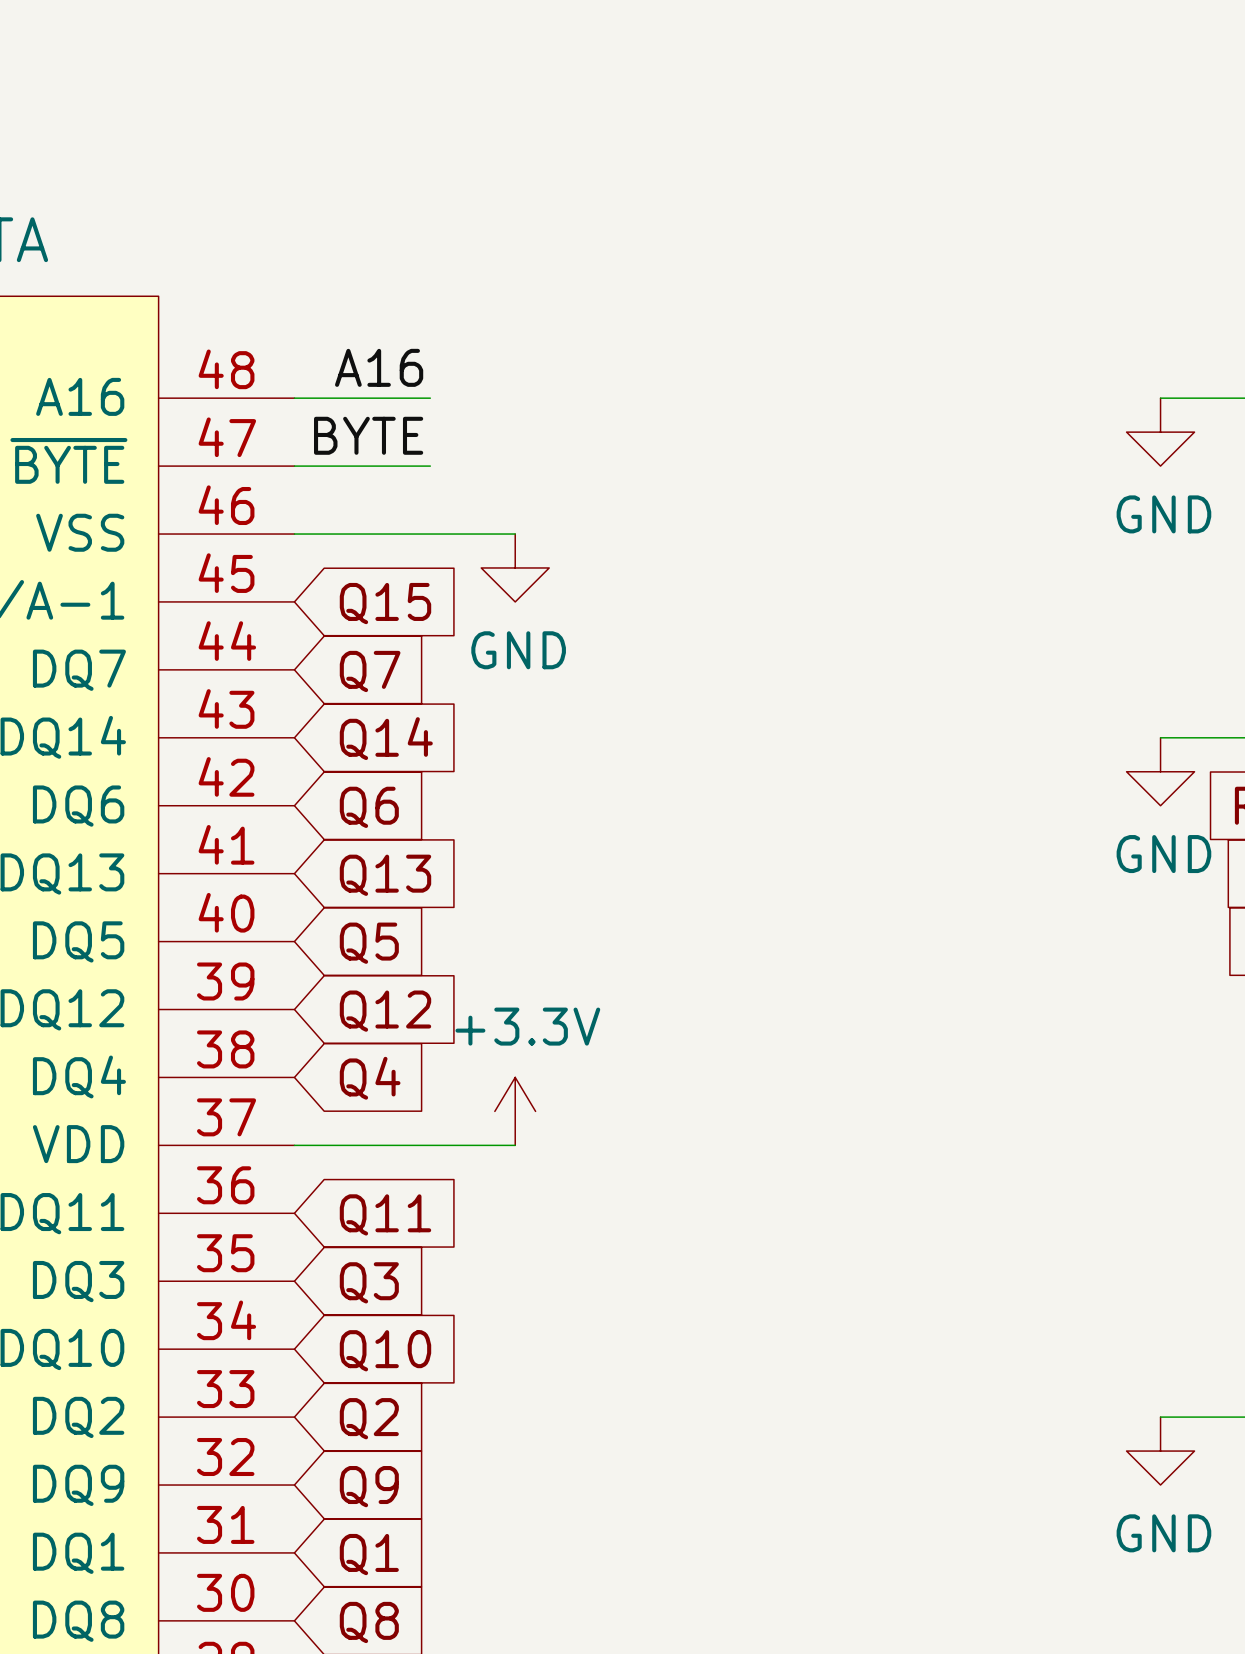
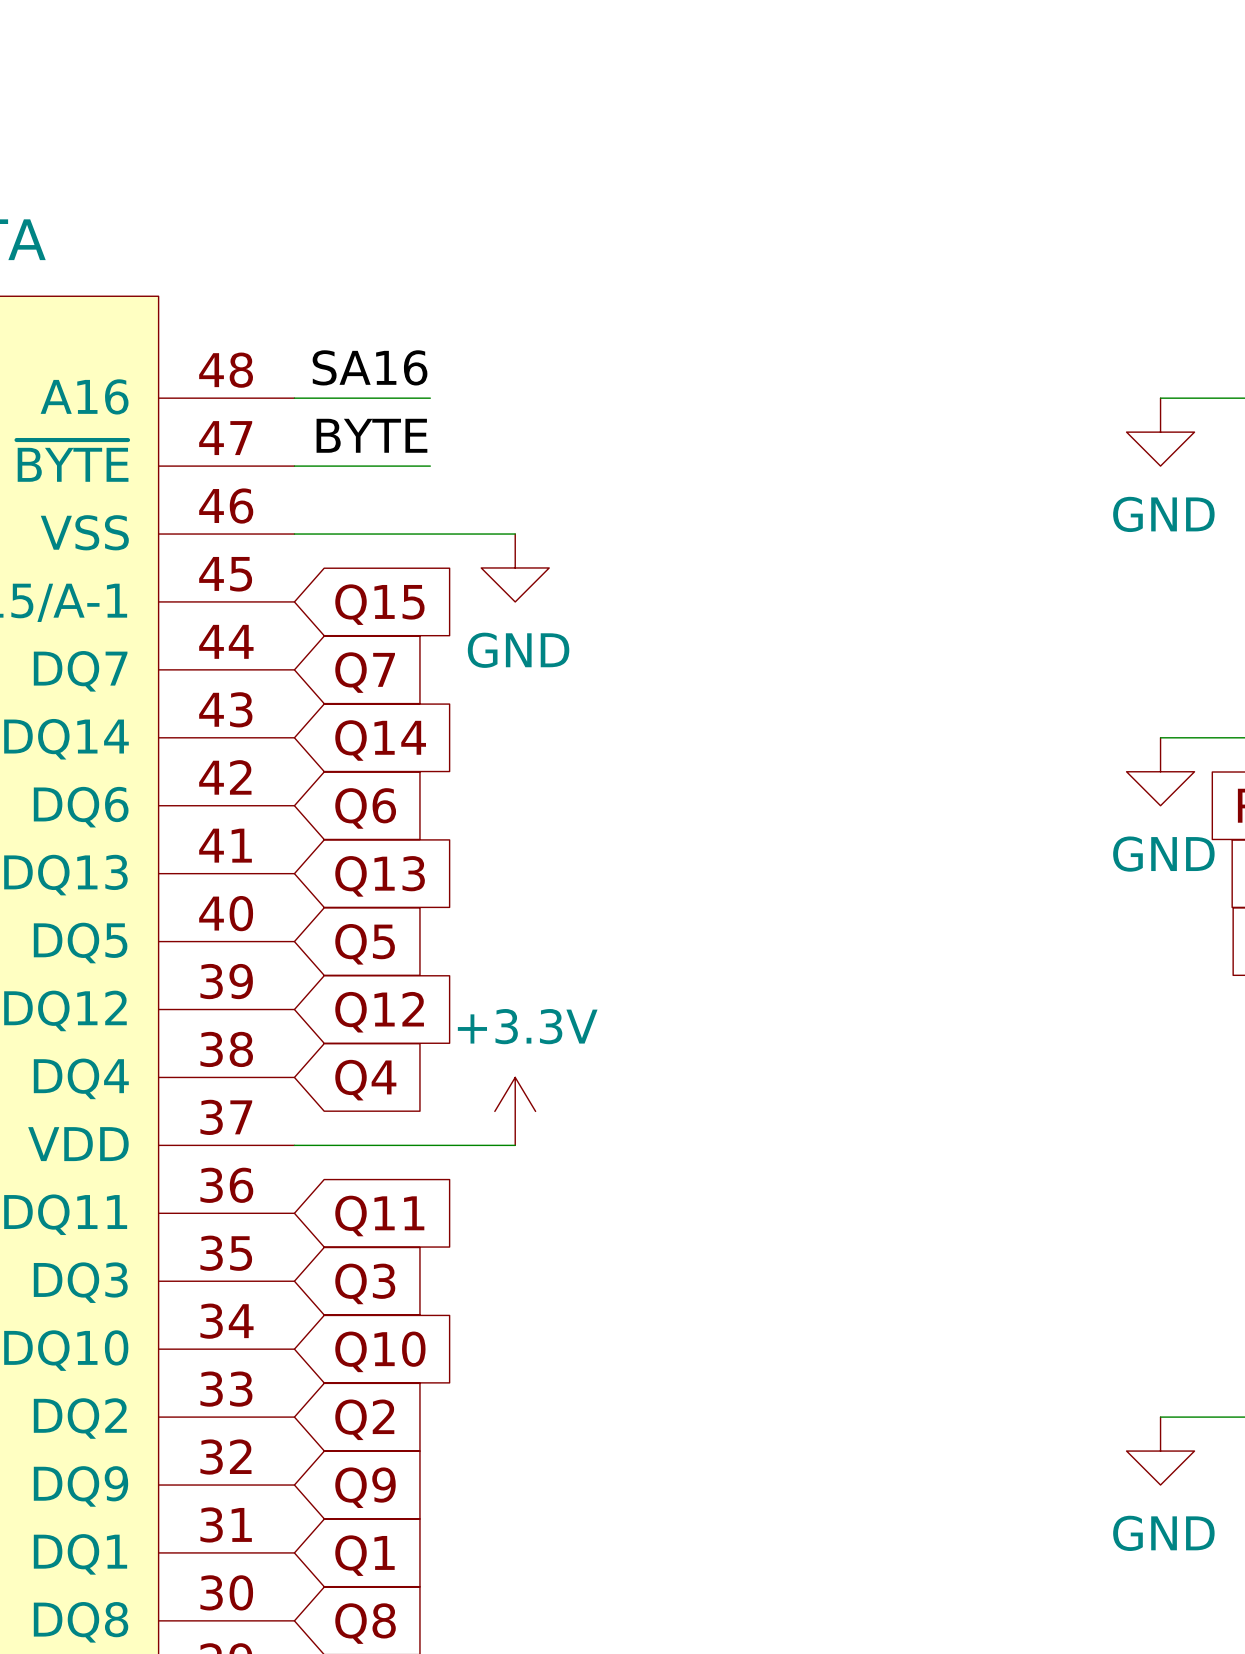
label: A16 (379, 367) -> SA16 (370, 367)

